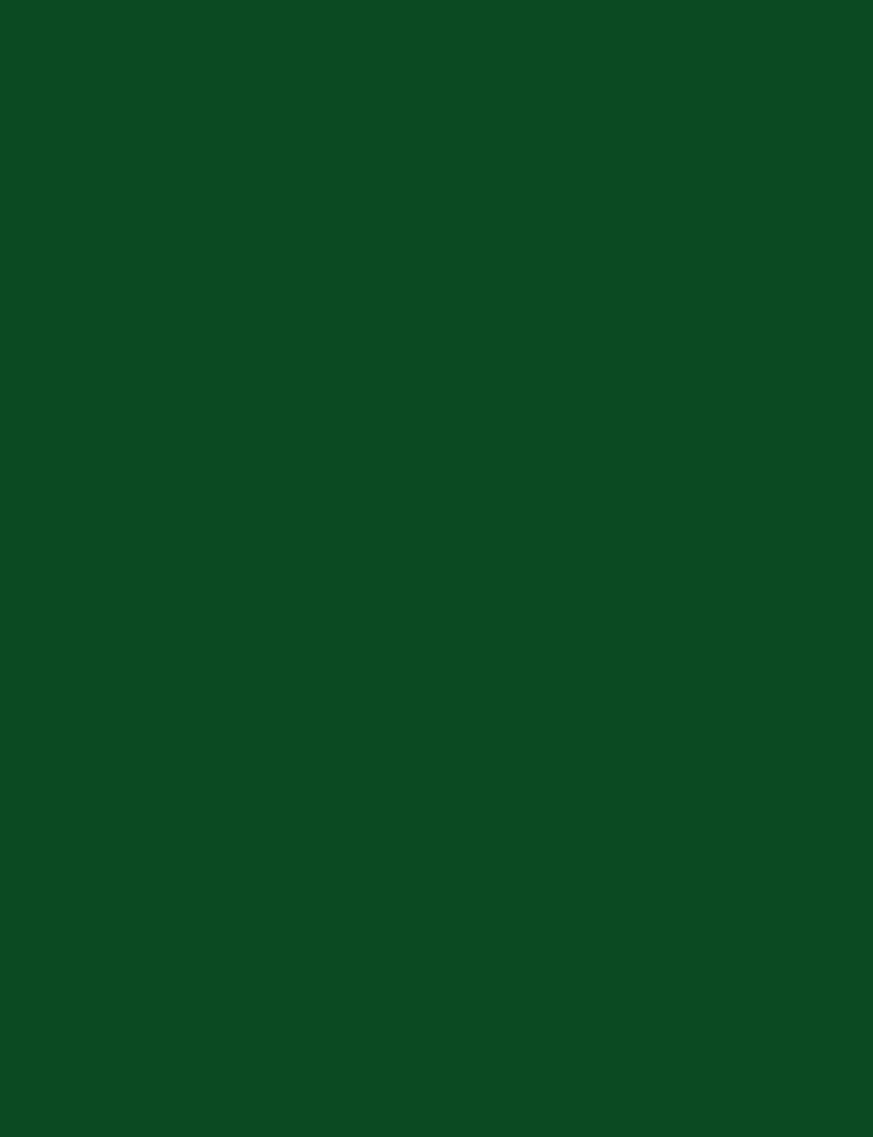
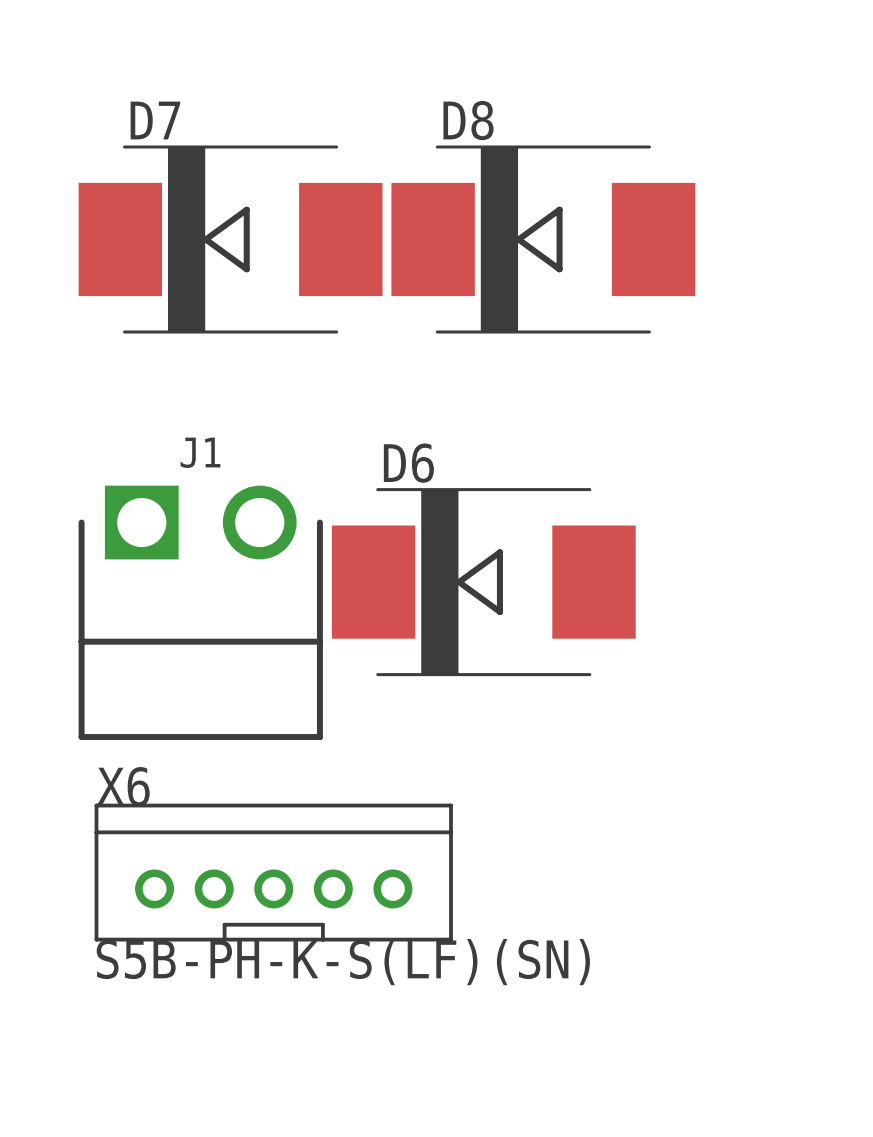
D7: none -> (230, 239)
D8: none -> (543, 239)
D6: none -> (483, 582)
J1: none -> (200, 612)
X6: none -> S5B-PH-K-S(LF)(SN) (273, 872)

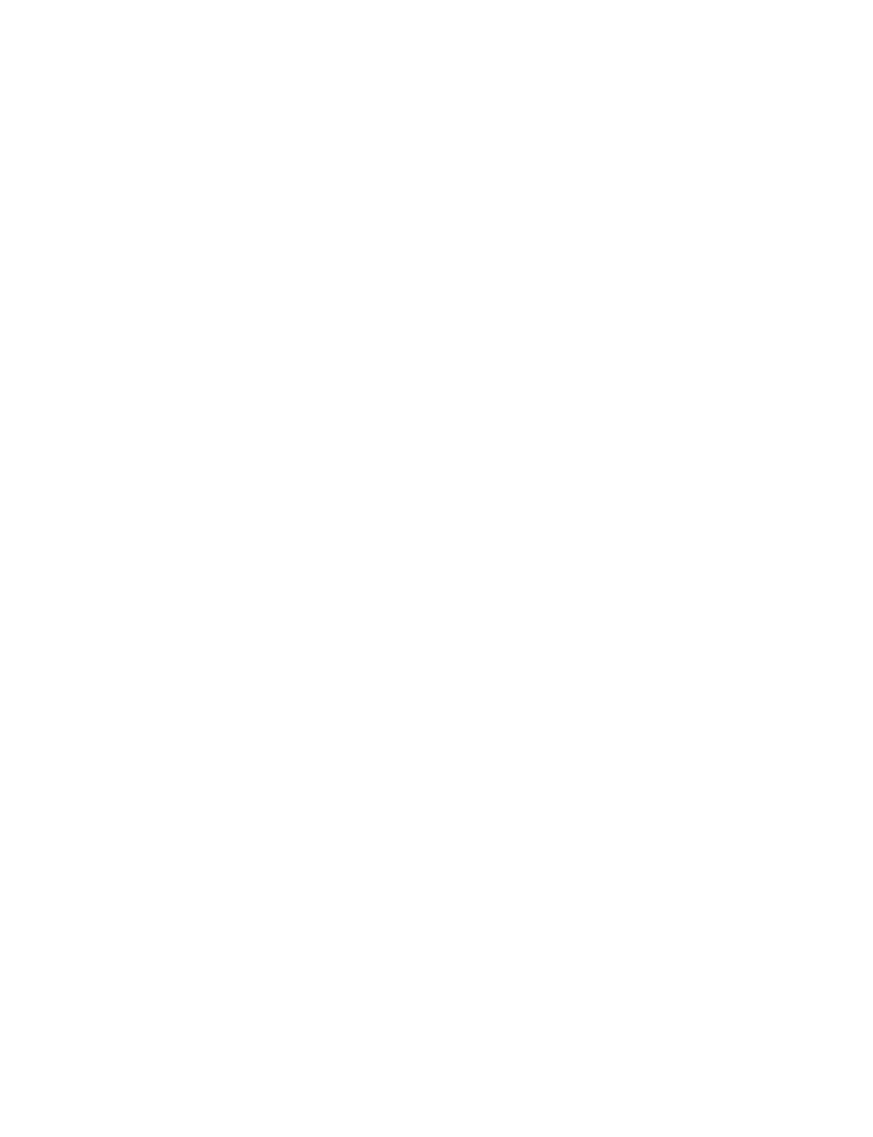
D7: (230, 239) -> none
D8: (543, 239) -> none
D6: (483, 582) -> none
J1: (200, 612) -> none
X6: S5B-PH-K-S(LF)(SN) (273, 872) -> none

